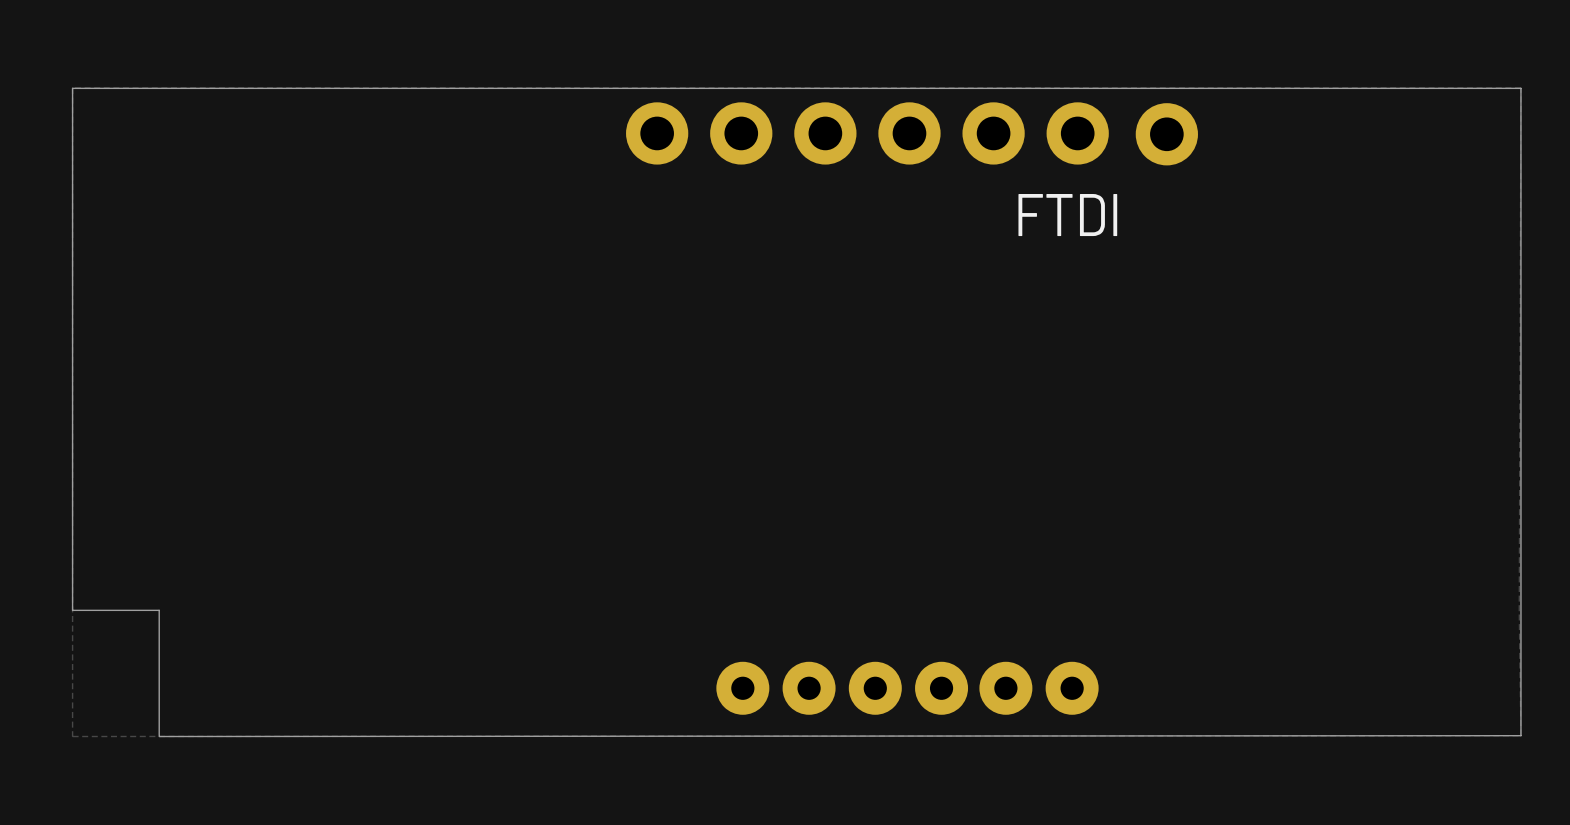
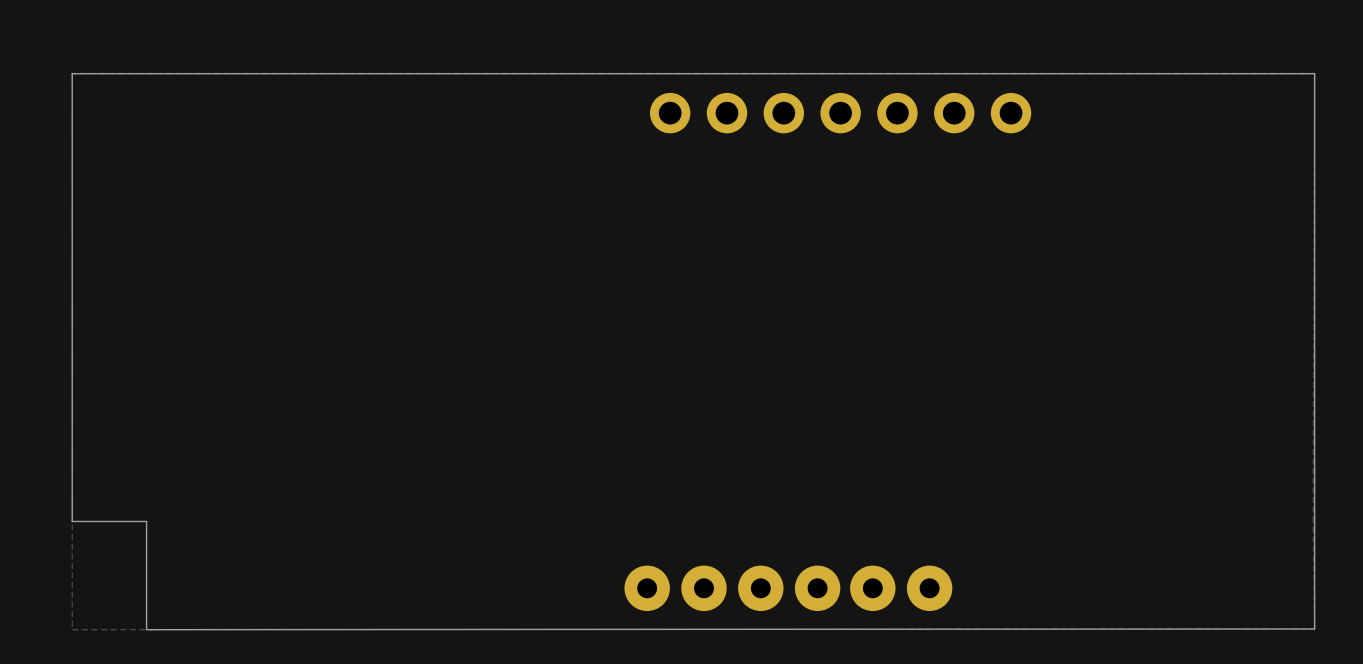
FTDI: (867, 133) -> none
part: none -> (840, 113)
part: (1166, 134) -> none

